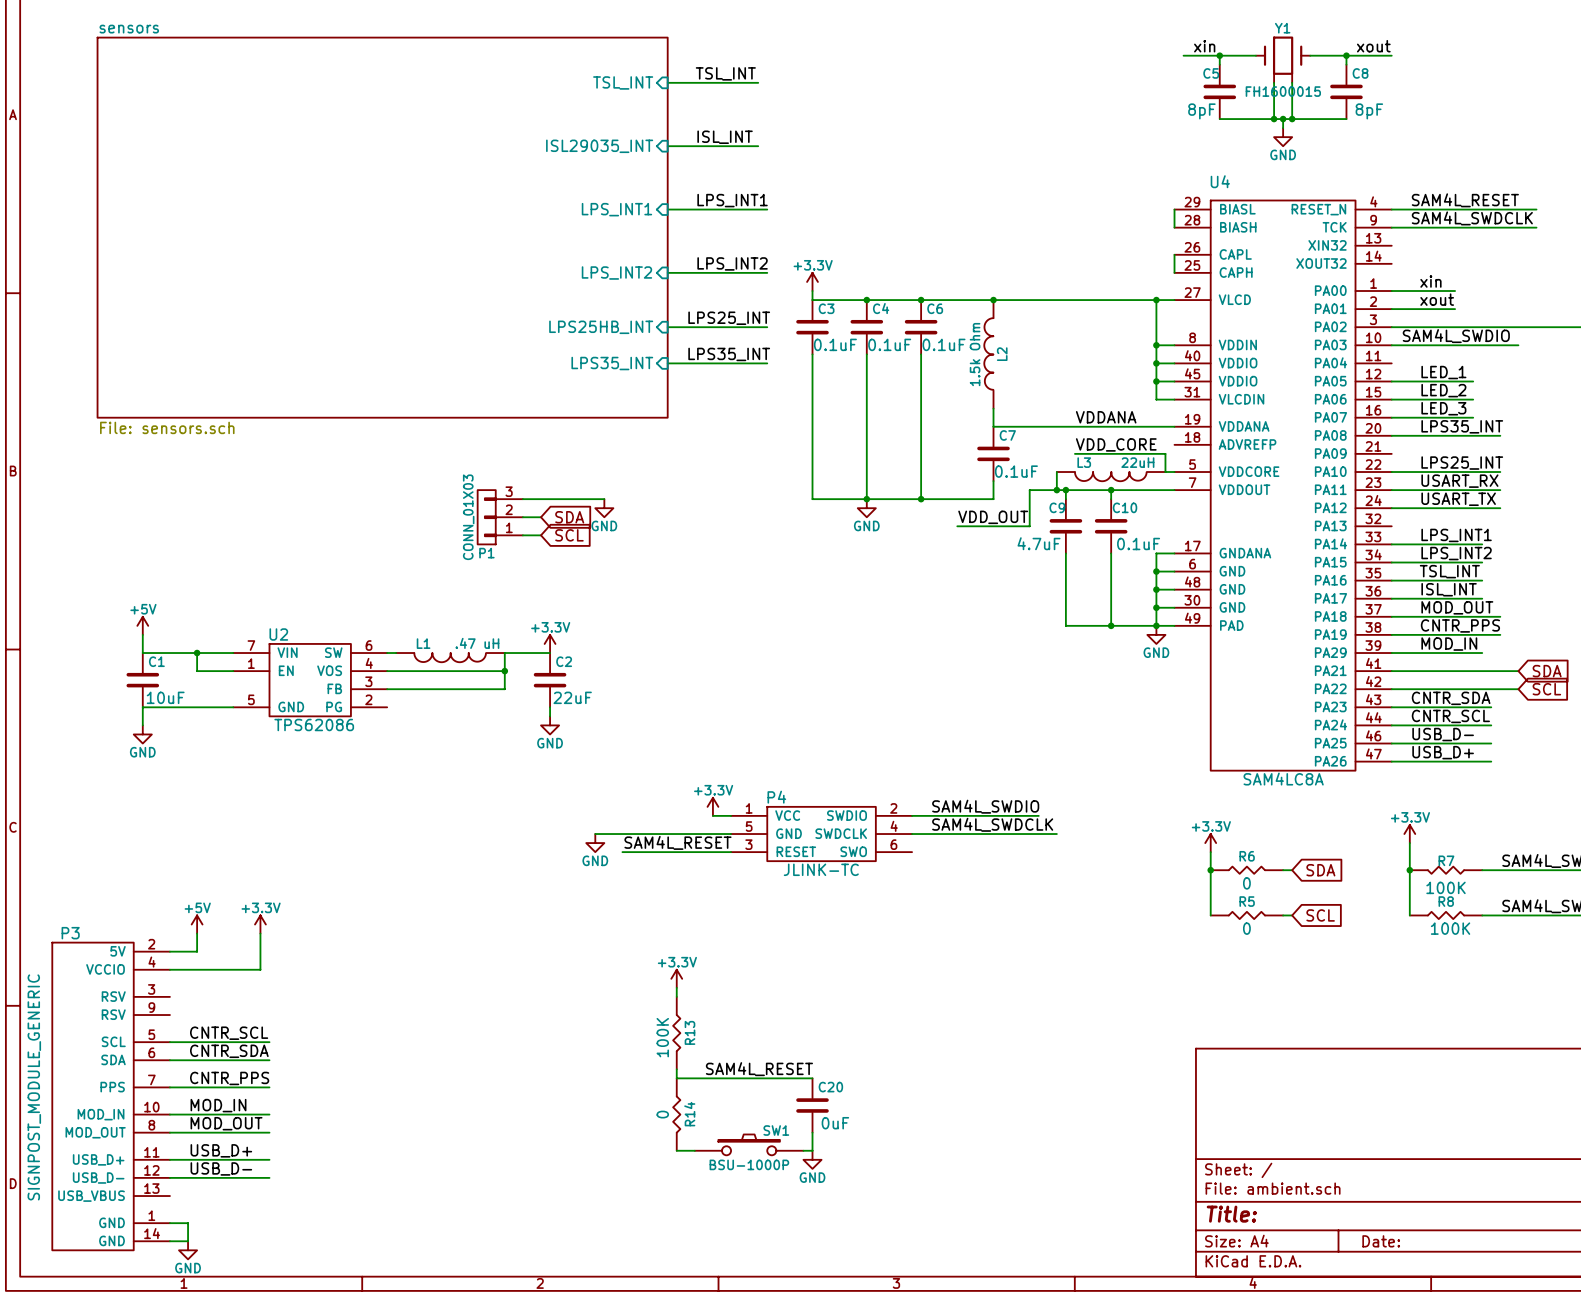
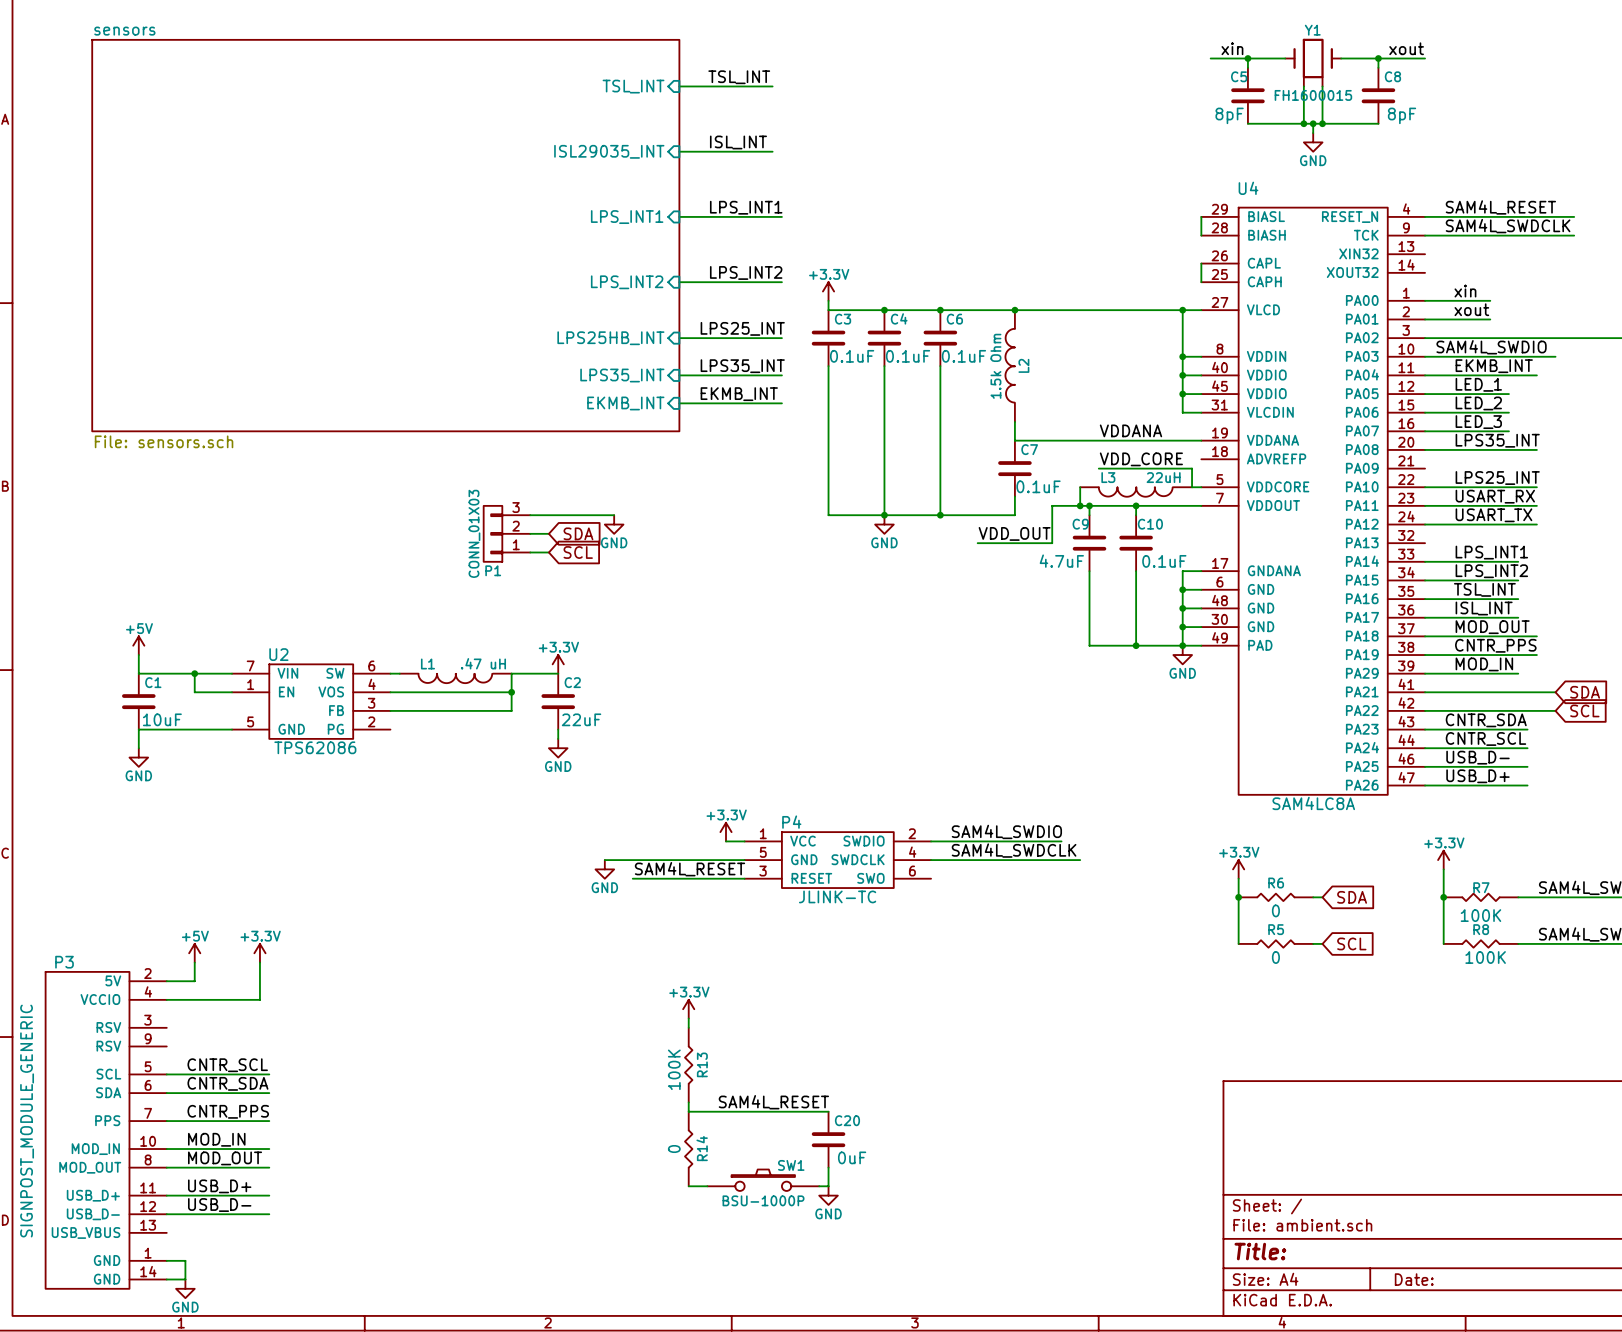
label: none -> EKMB_INT (1494, 366)
wire: none -> (1425, 375) (1536, 375)
label: none -> EKMB_INT (739, 394)
sheet pin: none -> EKMB_INT (625, 403)
wire: none -> (679, 403) (781, 403)

